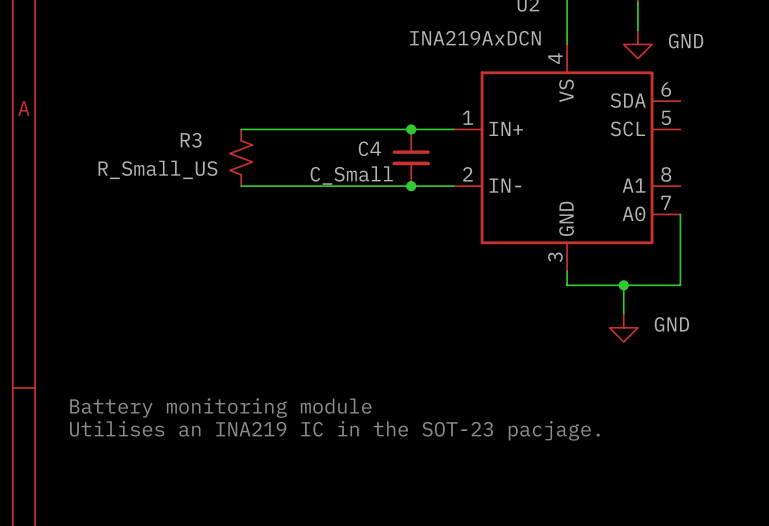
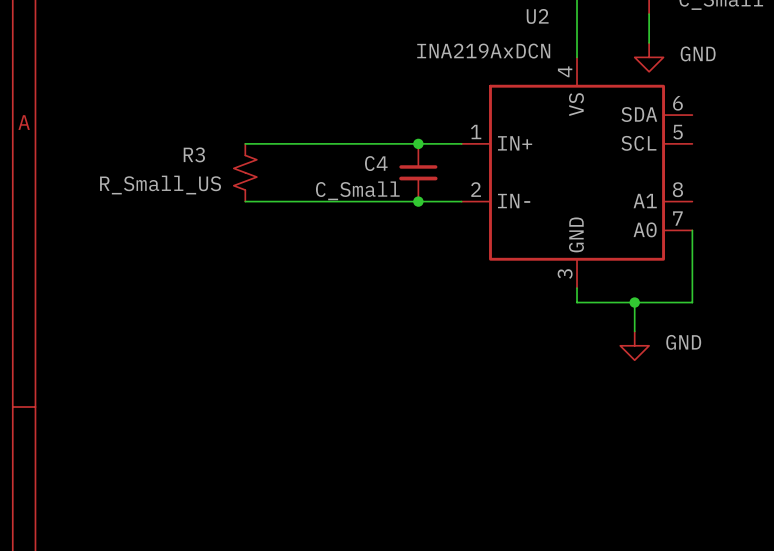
text: Battery monitoring module (220, 408) -> none
text: Utilises an INA219 IC in the SOT-23 pacjage. (334, 430) -> none

